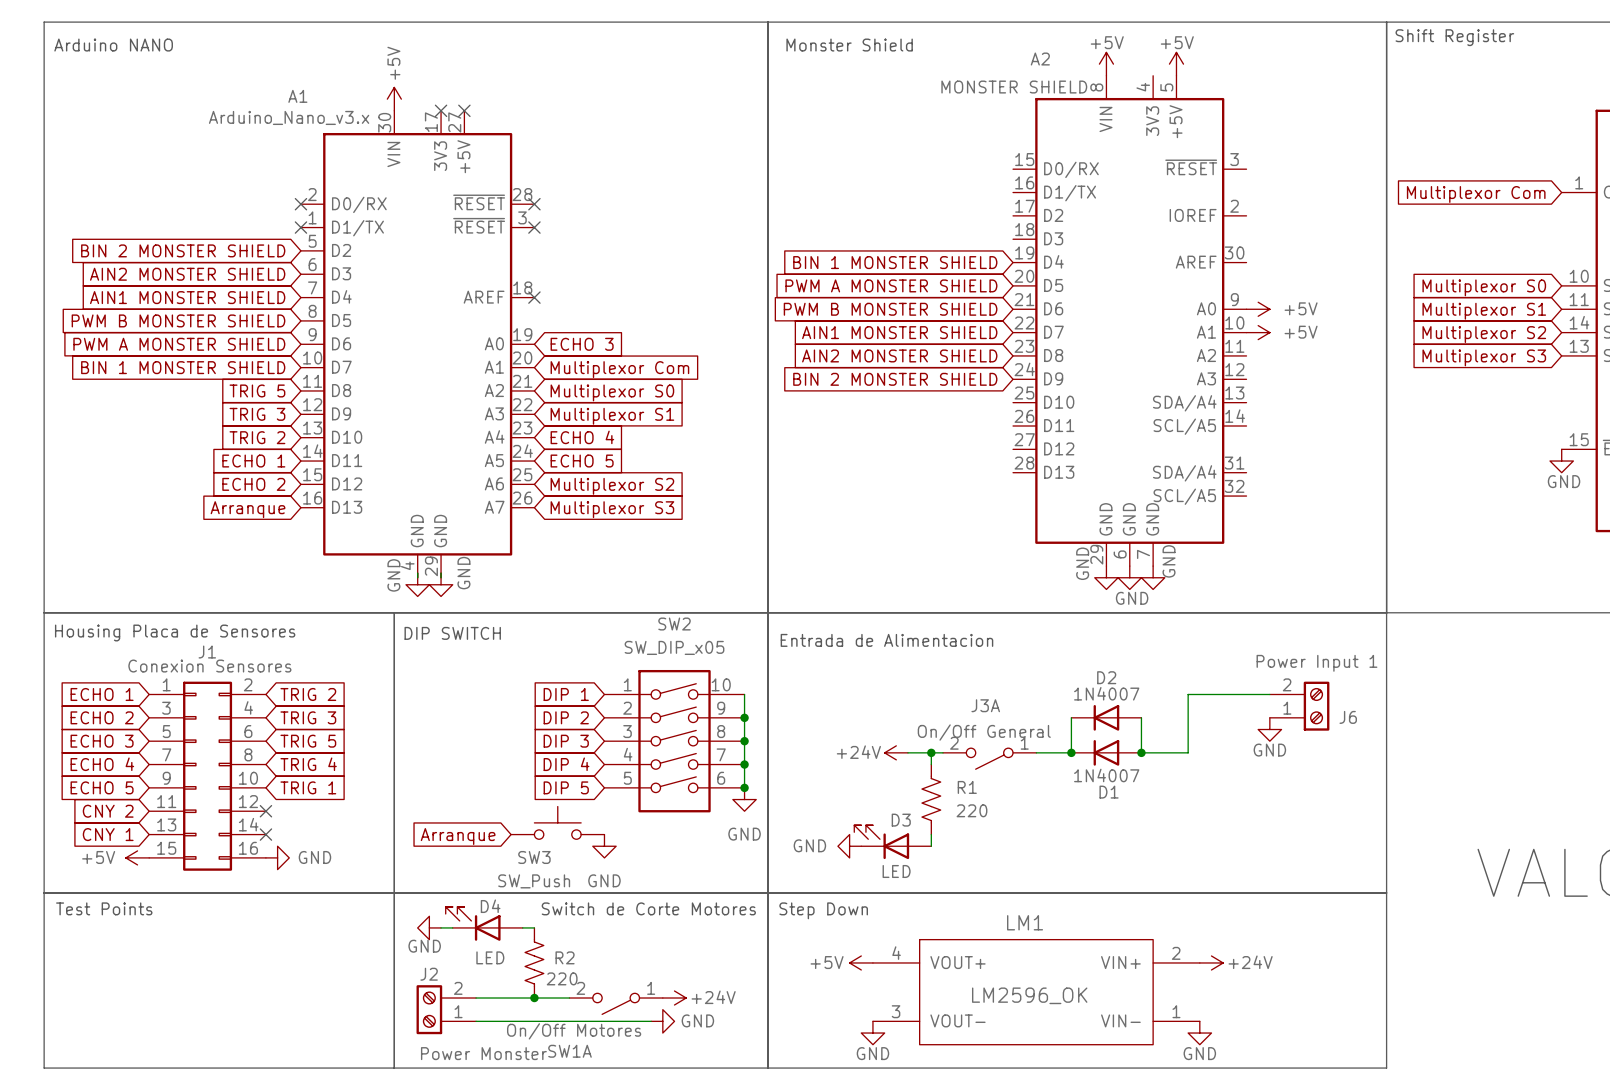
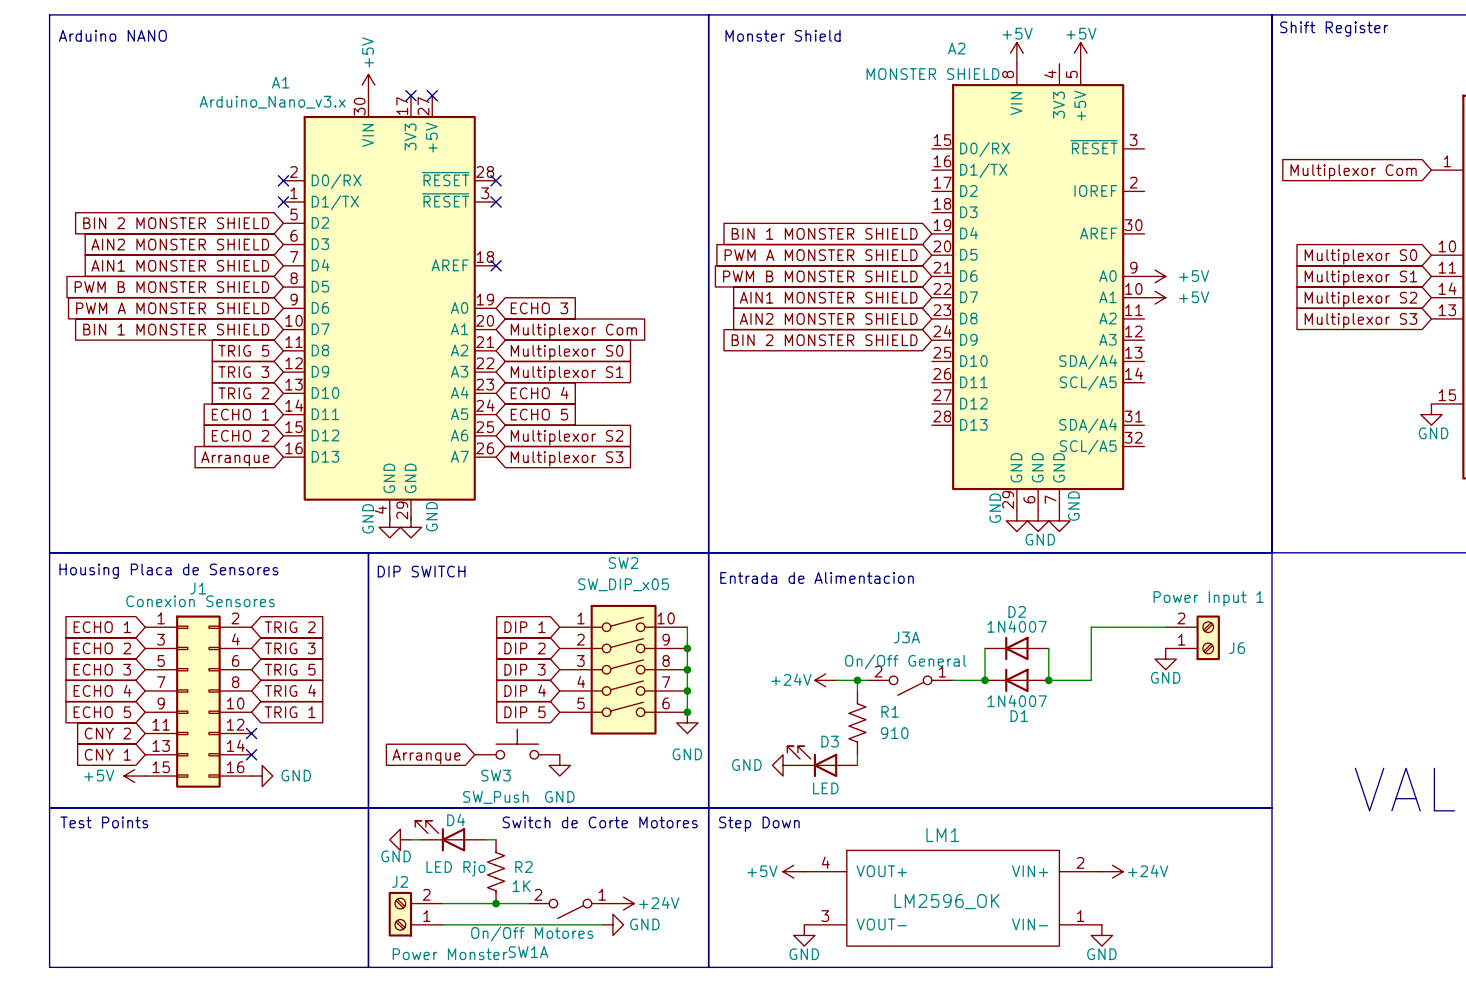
R1 value: 220 (971, 810) -> 910 (894, 733)
D4 value: LED (490, 957) -> LED Rjo (455, 868)
R2 value: 220 (562, 978) -> 1K (521, 886)

